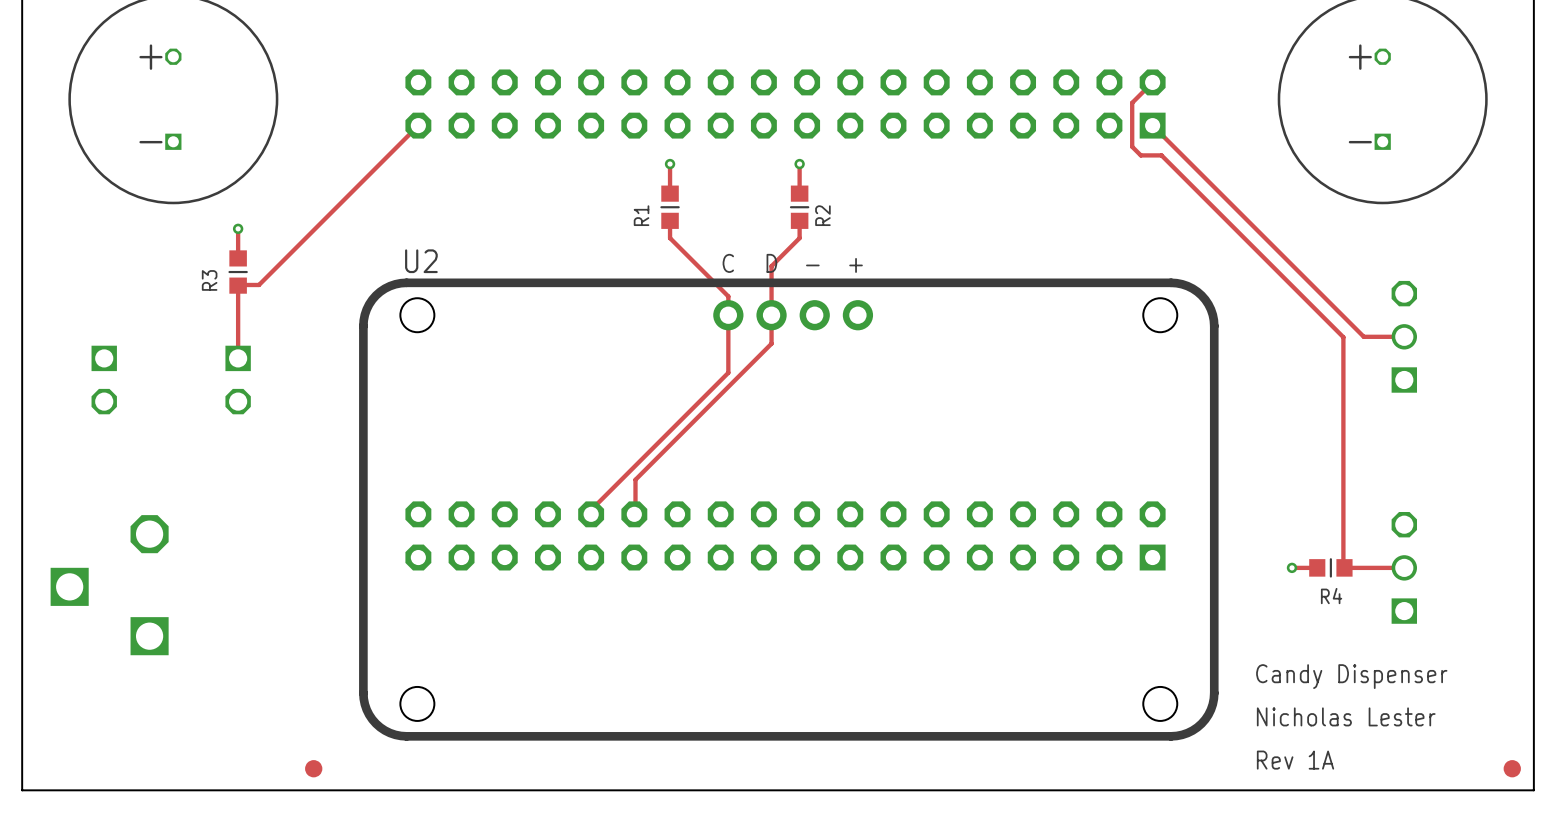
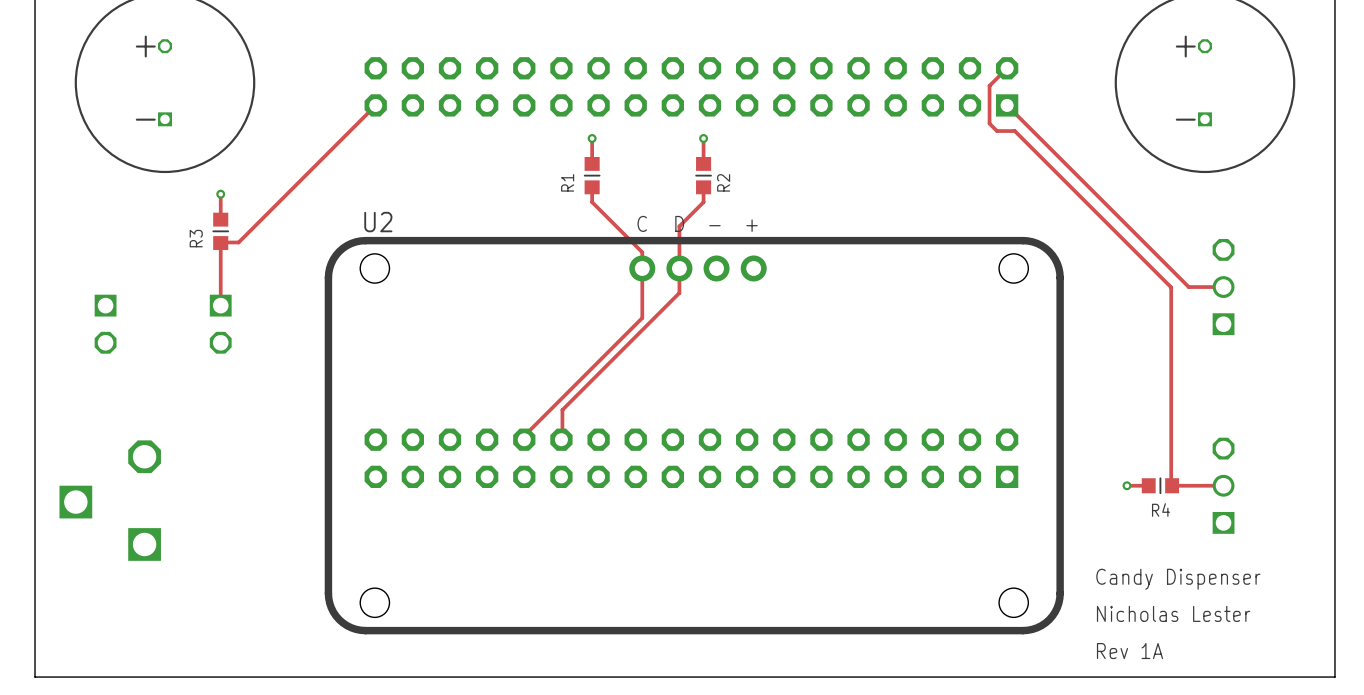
part: (313, 768) -> none
part: (1512, 768) -> none

